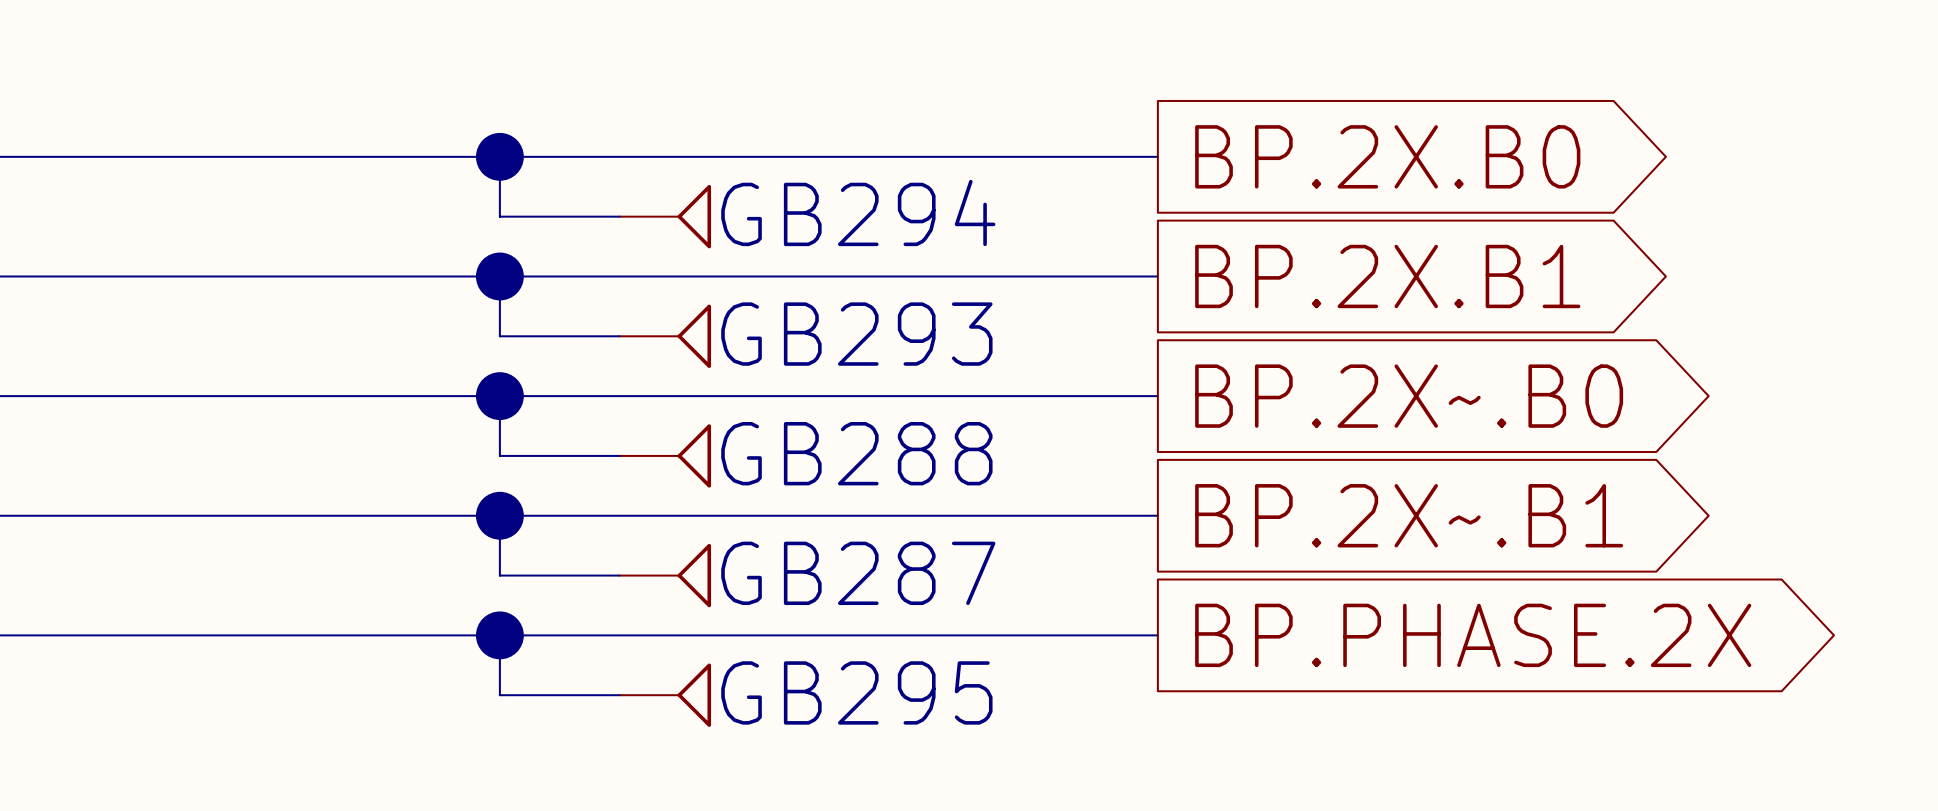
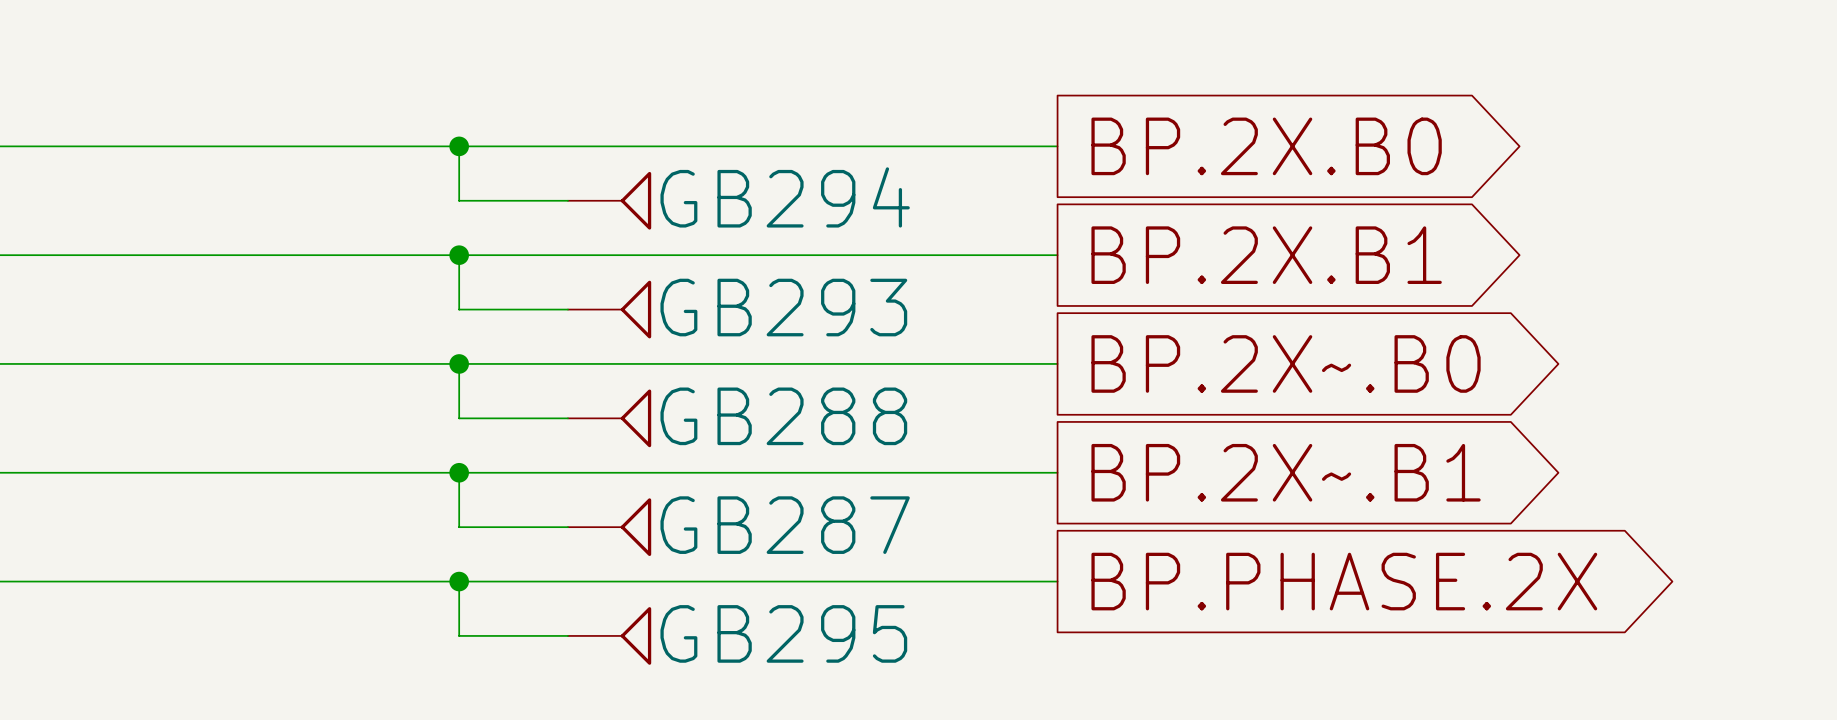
junction size: [475, 132, 524, 181] -> [449, 136, 469, 157]
junction size: [475, 252, 524, 301] -> [449, 245, 469, 265]
junction size: [475, 372, 524, 421] -> [449, 354, 469, 374]
junction size: [475, 491, 524, 540] -> [449, 462, 469, 483]
junction size: [475, 611, 524, 660] -> [449, 571, 469, 592]

